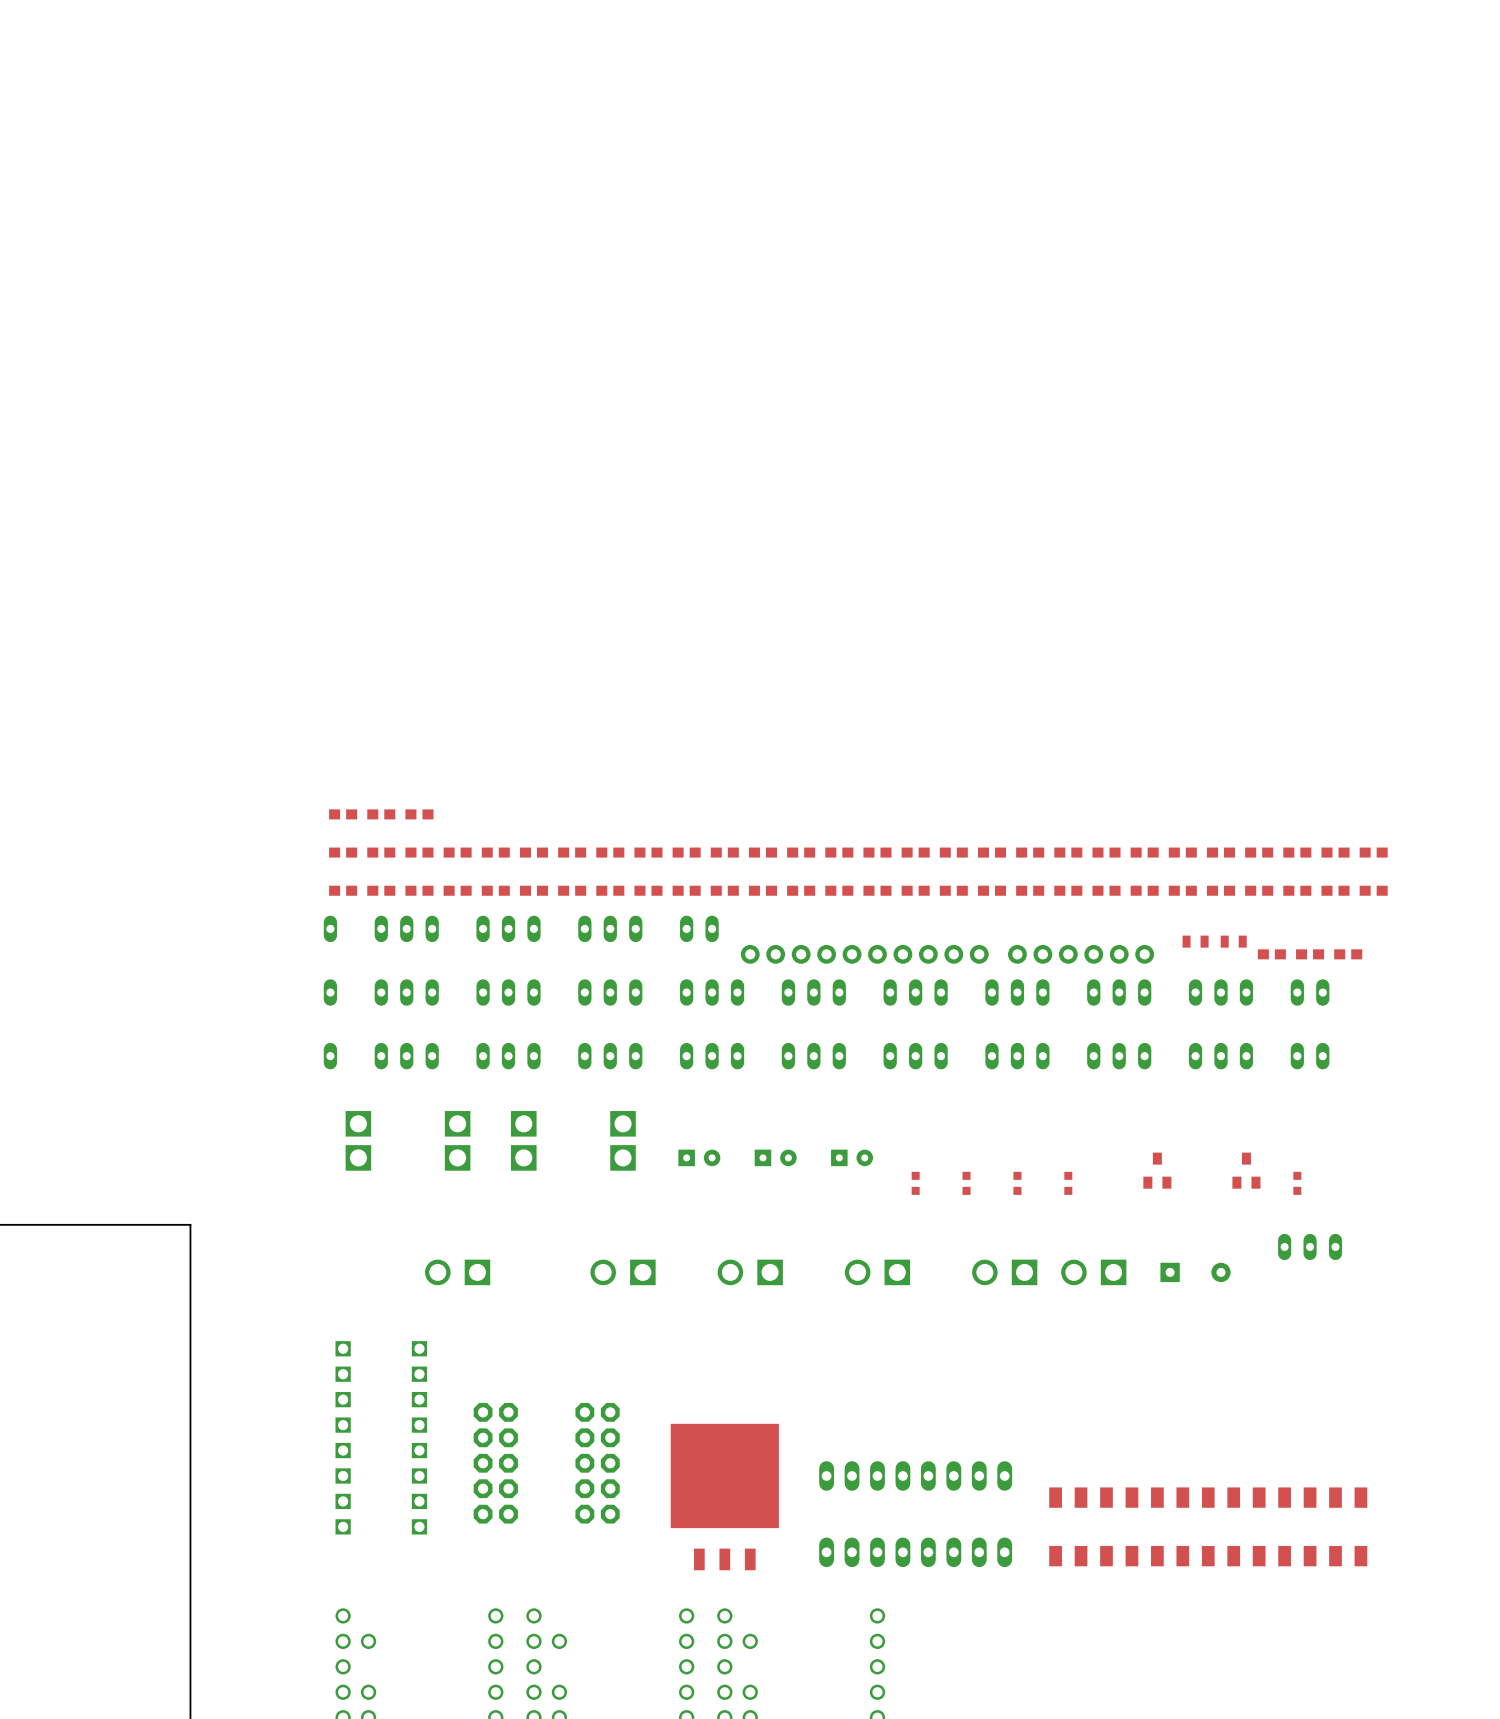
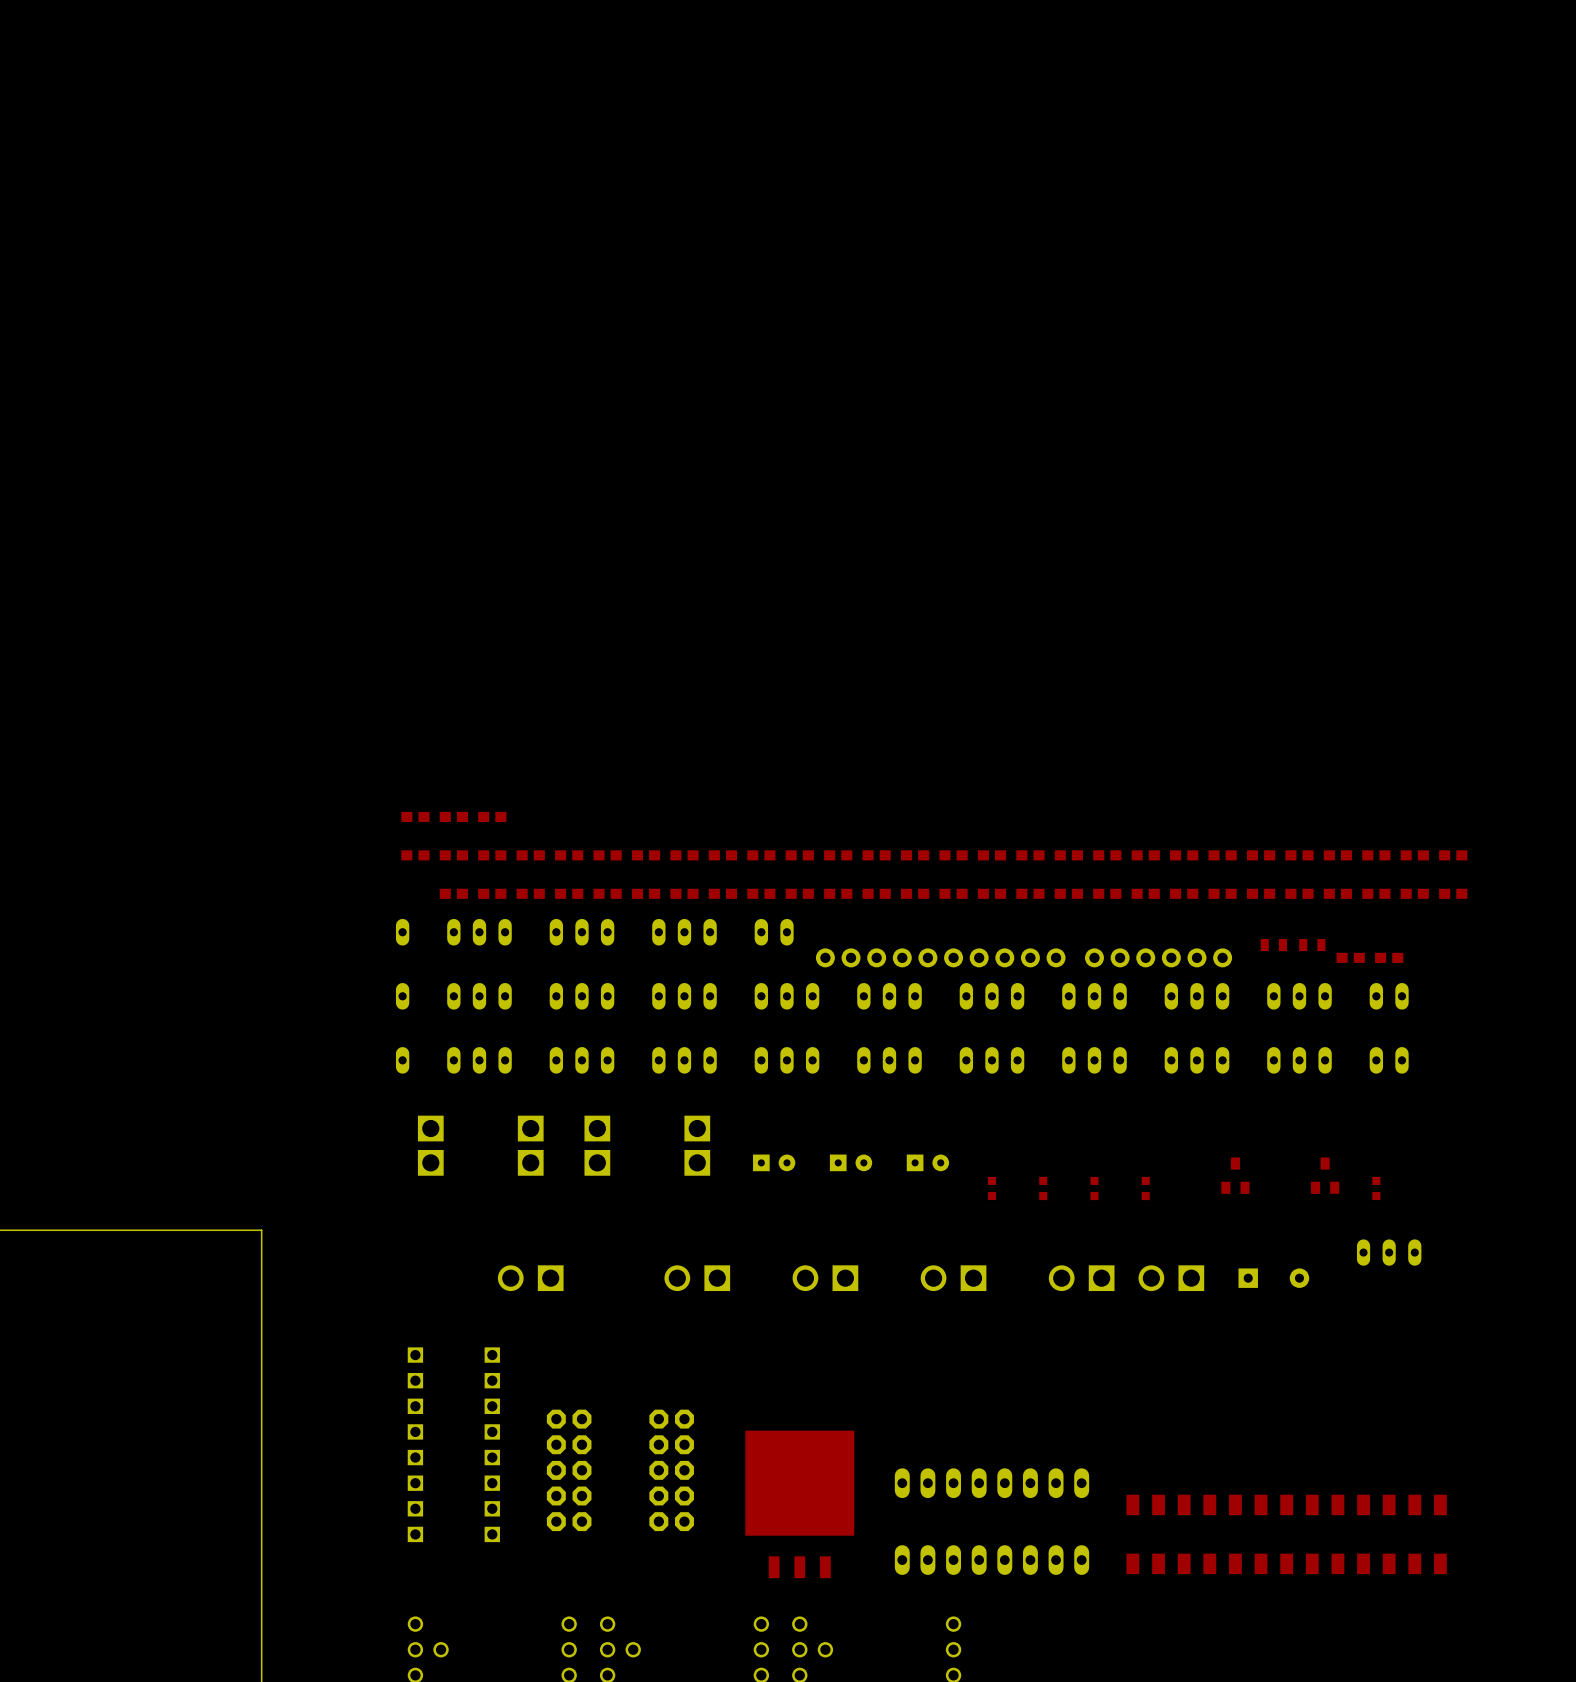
part: (343, 890) -> none
part: (1348, 954) -> none

